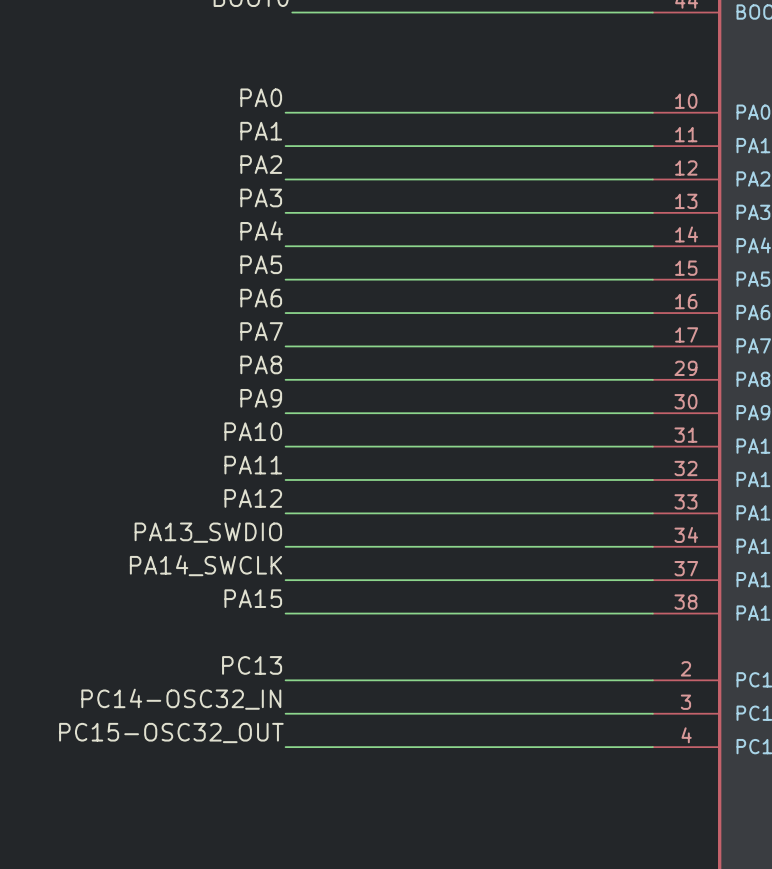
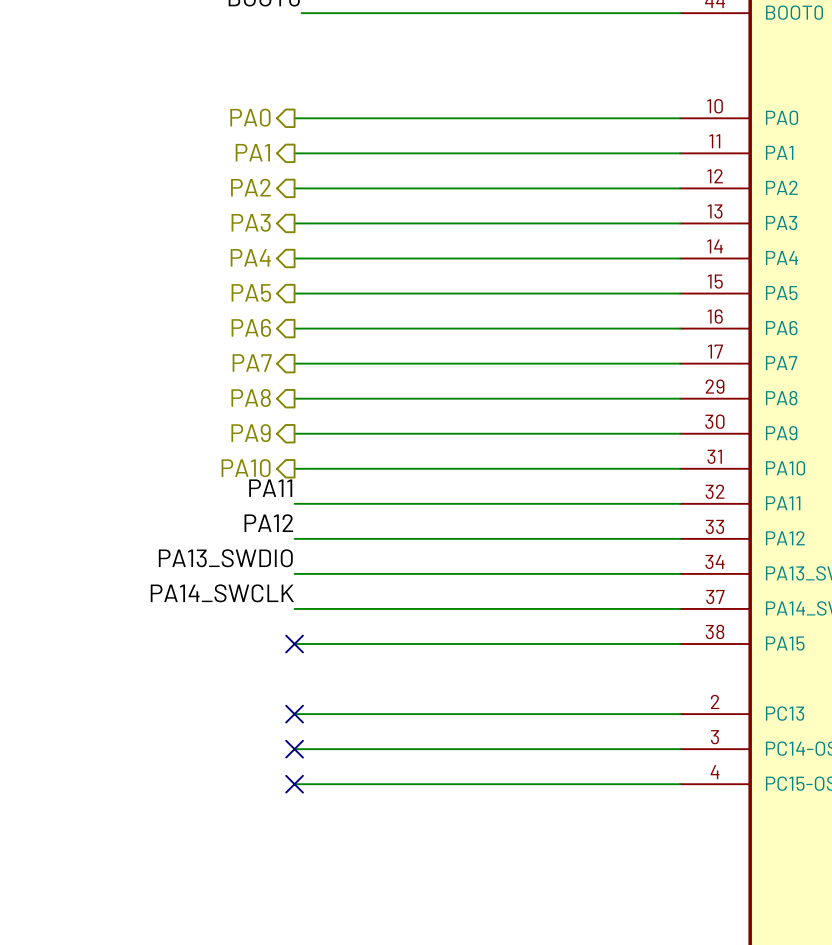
label: PA0 (261, 97) -> none
hierarchical label: none -> PA0 (250, 117)
label: PA1 (261, 131) -> none
hierarchical label: none -> PA1 (252, 152)
label: PA2 (261, 164) -> none
hierarchical label: none -> PA2 (250, 187)
label: PA3 (261, 197) -> none
hierarchical label: none -> PA3 (251, 222)
label: PA4 (261, 230) -> none
hierarchical label: none -> PA4 (250, 257)
label: PA5 (261, 264) -> none
hierarchical label: none -> PA5 (251, 292)
label: PA6 (261, 298) -> none
hierarchical label: none -> PA6 (251, 327)
label: PA7 (261, 331) -> none
hierarchical label: none -> PA7 (252, 362)
label: PA8 (261, 364) -> none
hierarchical label: none -> PA8 (251, 398)
label: PA9 (261, 398) -> none
hierarchical label: none -> PA9 (251, 433)
label: PA10 (253, 431) -> none
hierarchical label: none -> PA10 (246, 468)
label: PA15 (253, 598) -> none
no-connect mark: none -> (294, 644)
label: PC13 (252, 665) -> none
no-connect mark: none -> (294, 714)
label: PC14-OSC32_IN (181, 699) -> none
no-connect mark: none -> (294, 749)
label: PC15-OSC32_OUT (171, 733) -> none
no-connect mark: none -> (294, 784)

